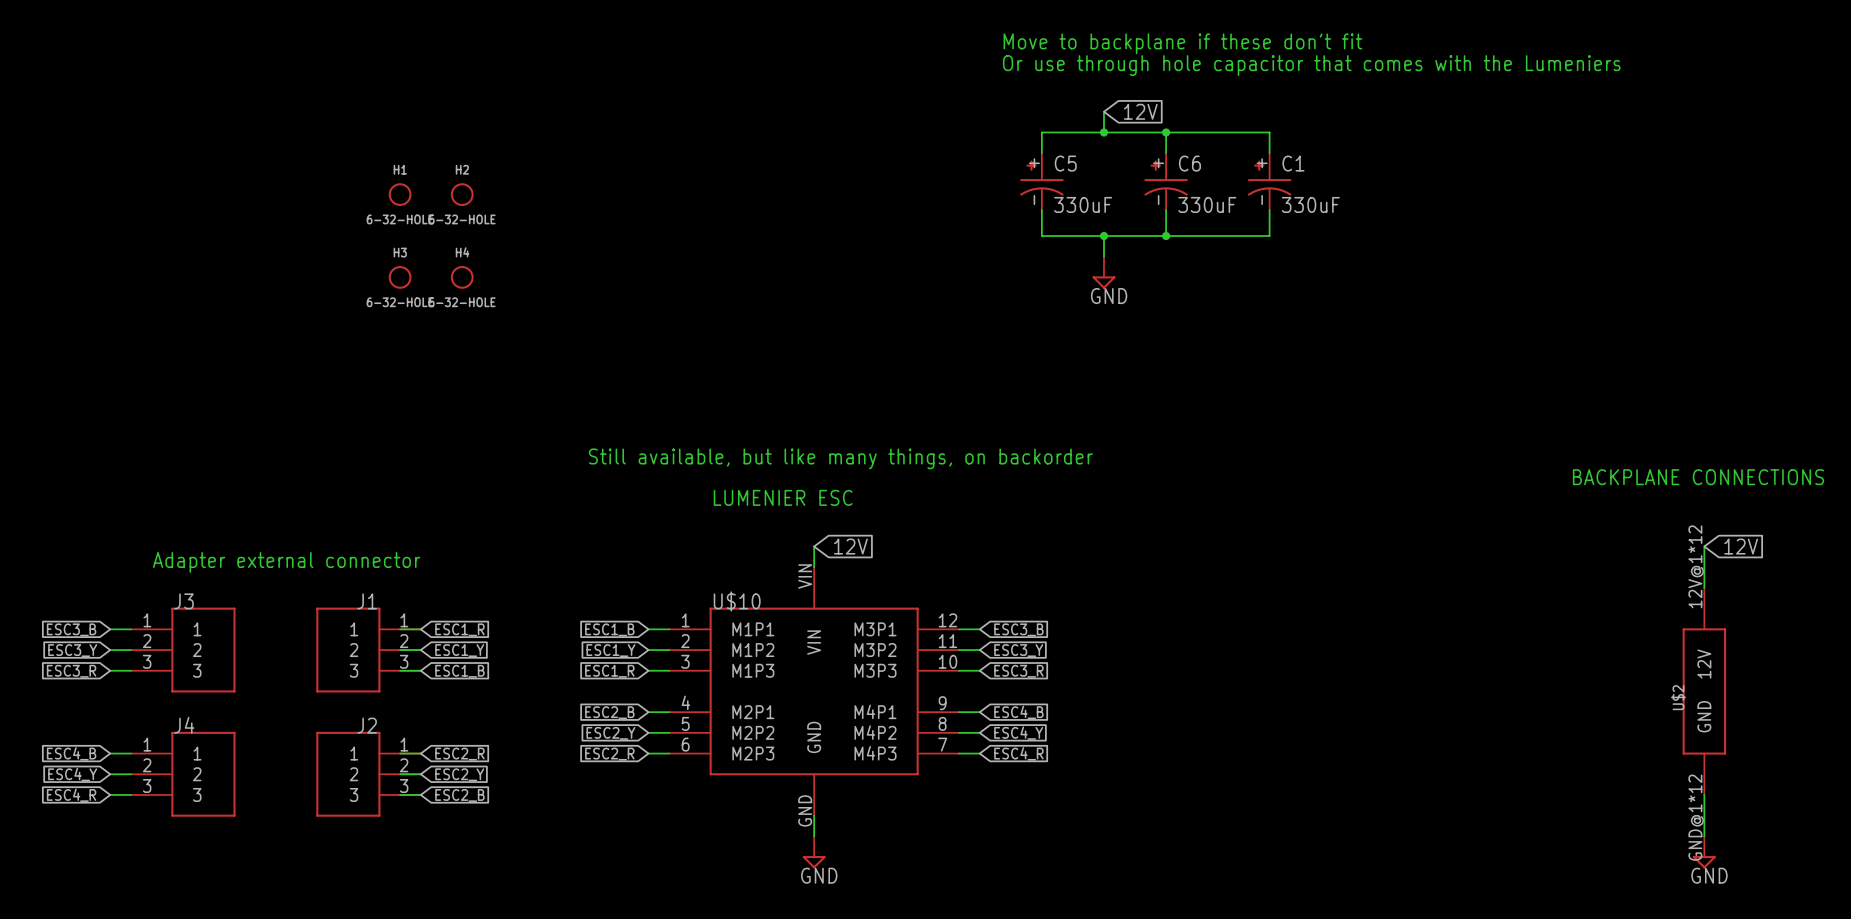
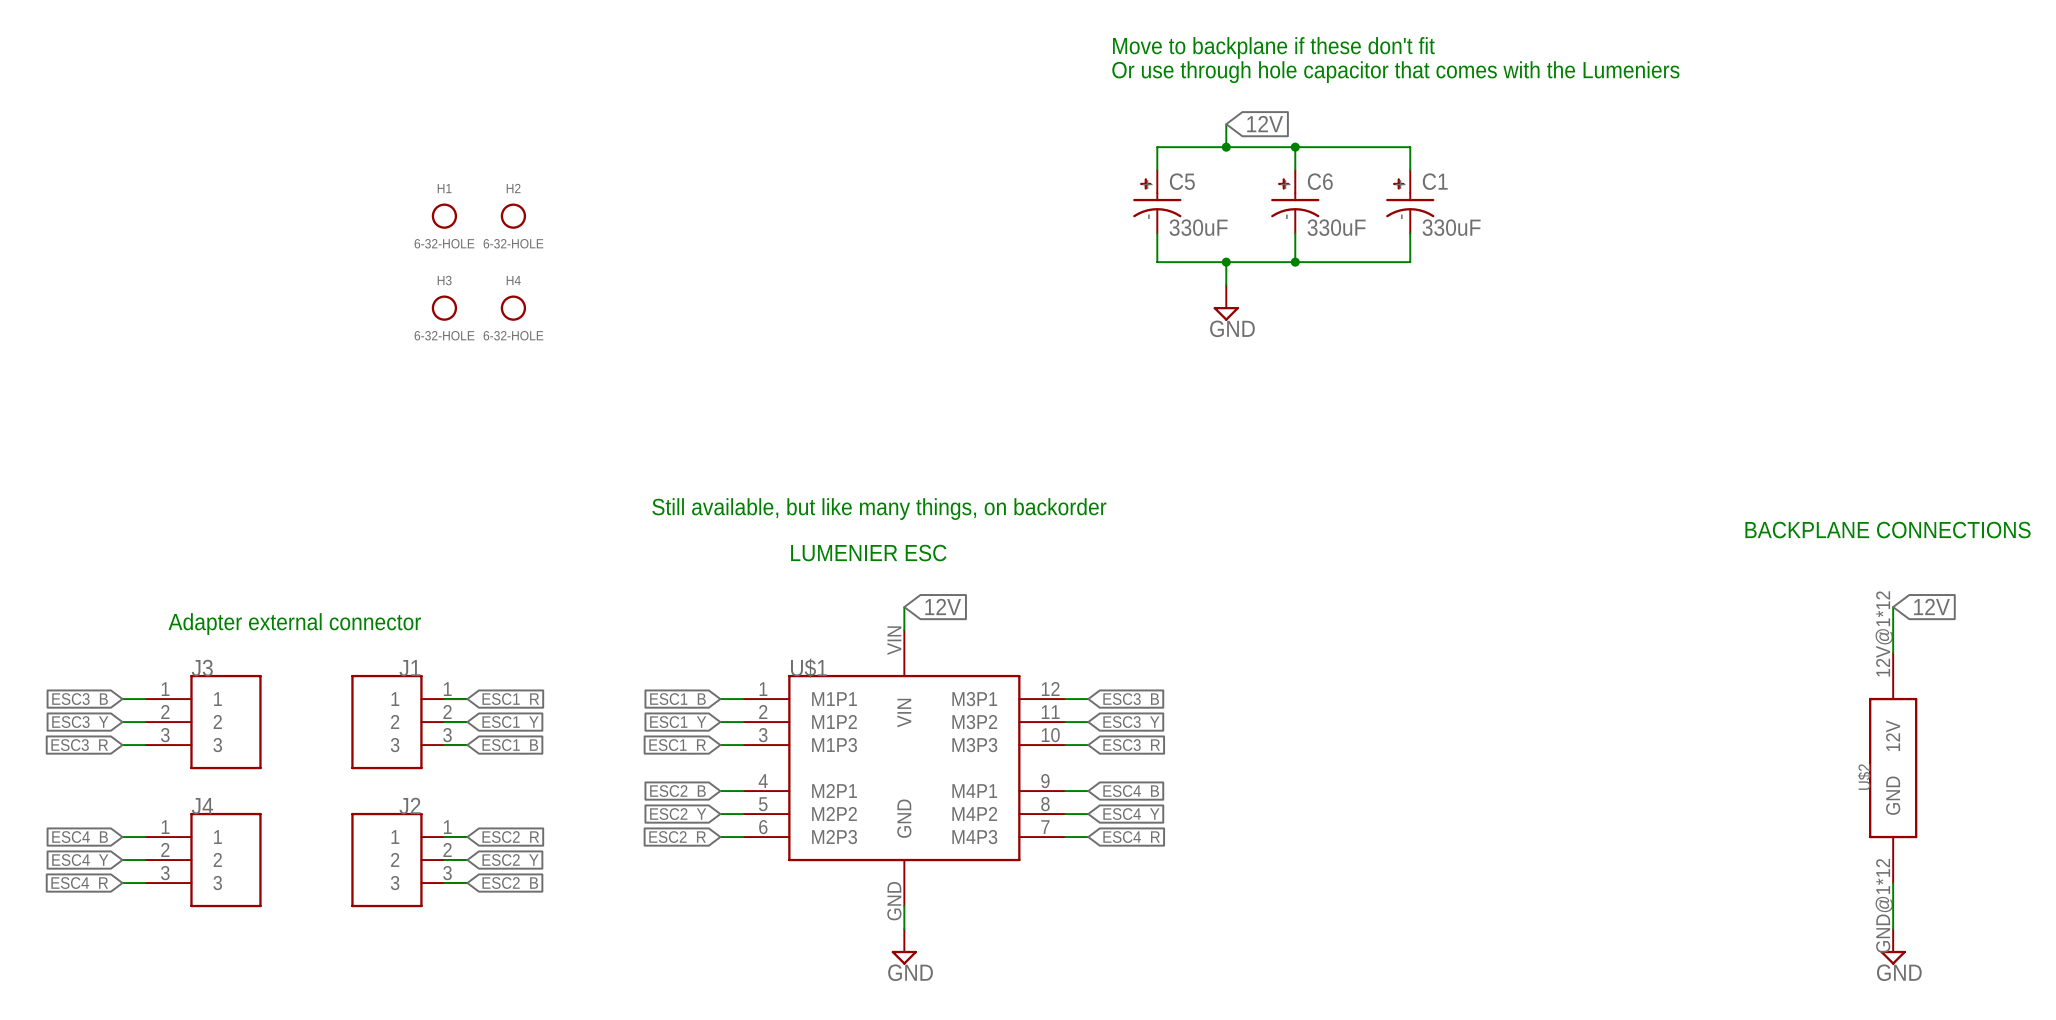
U$10 name: U$10 (737, 601) -> U$1 (808, 668)

